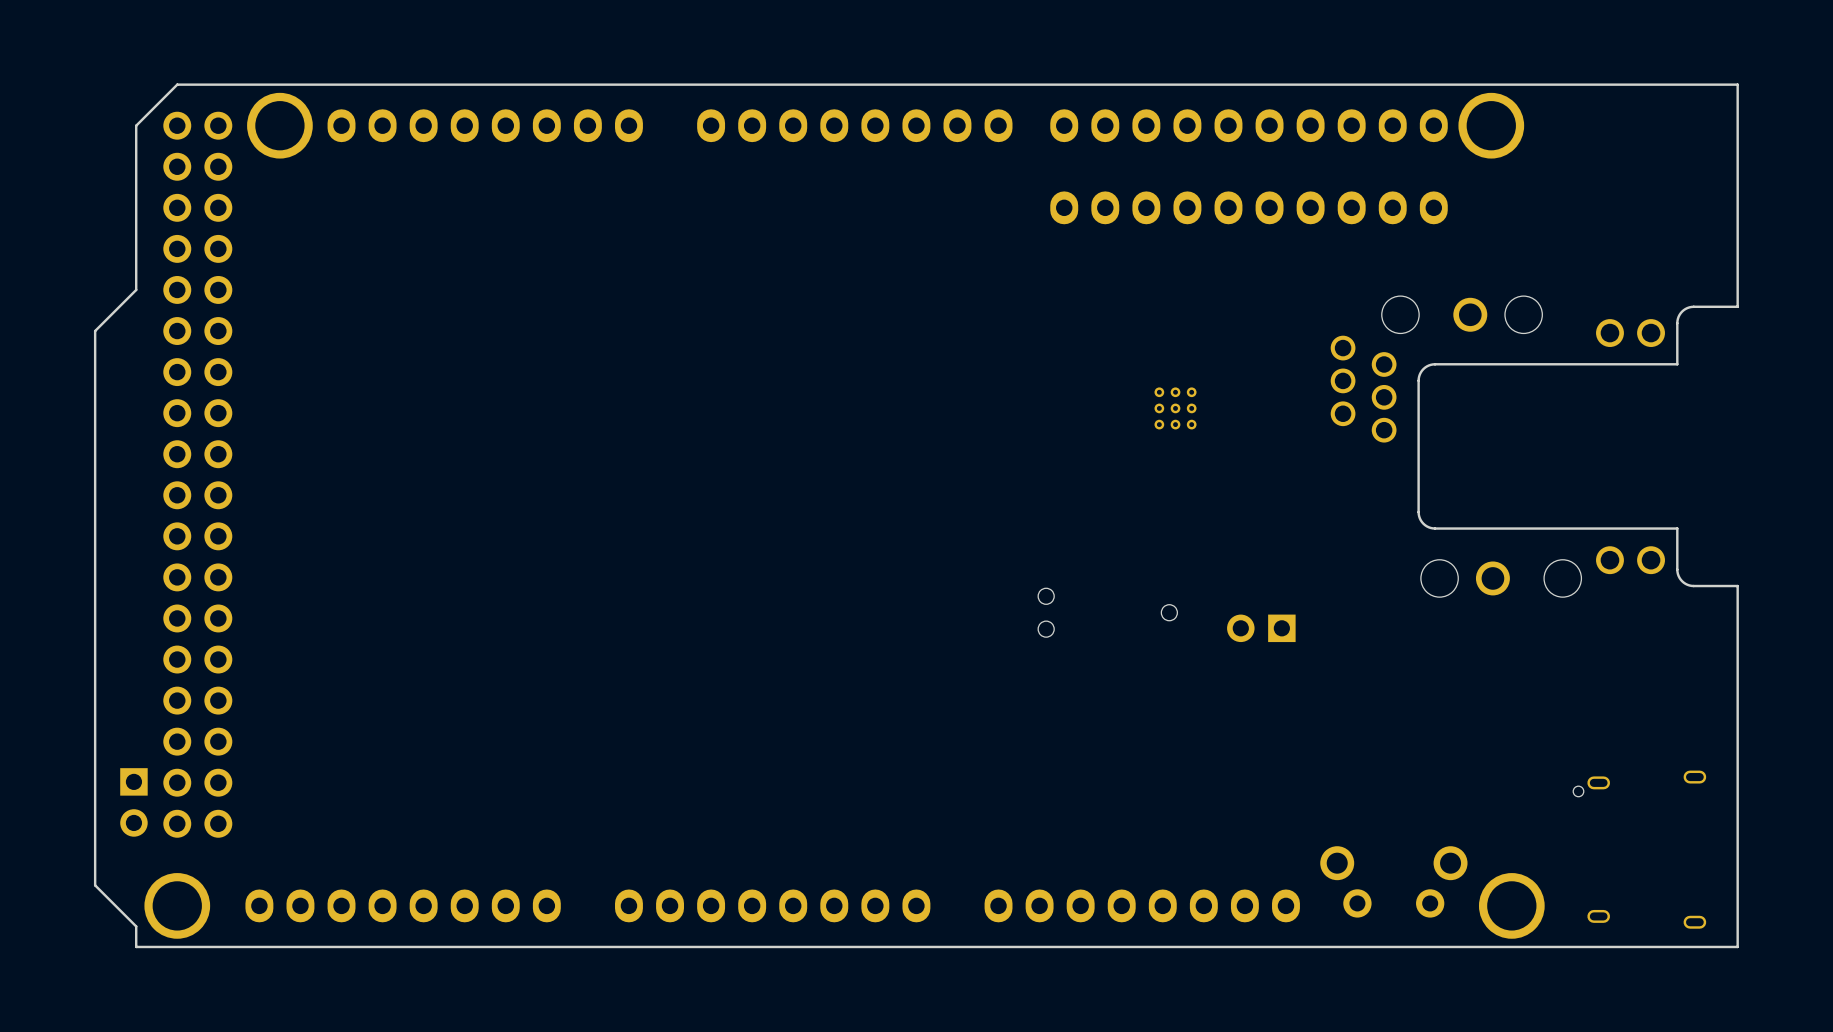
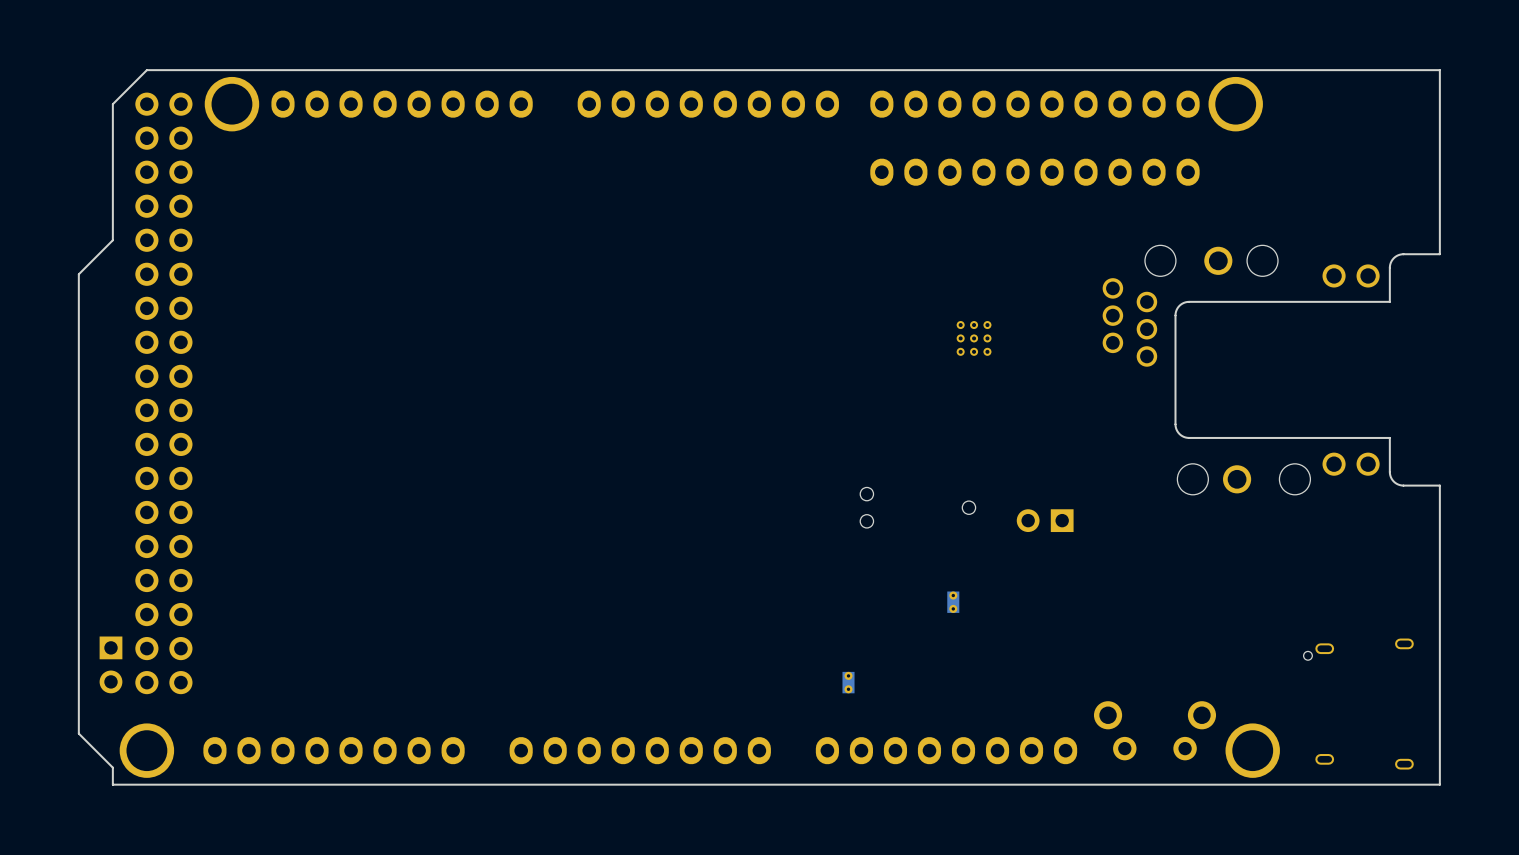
part: none -> (953, 602)
part: none -> (848, 682)

